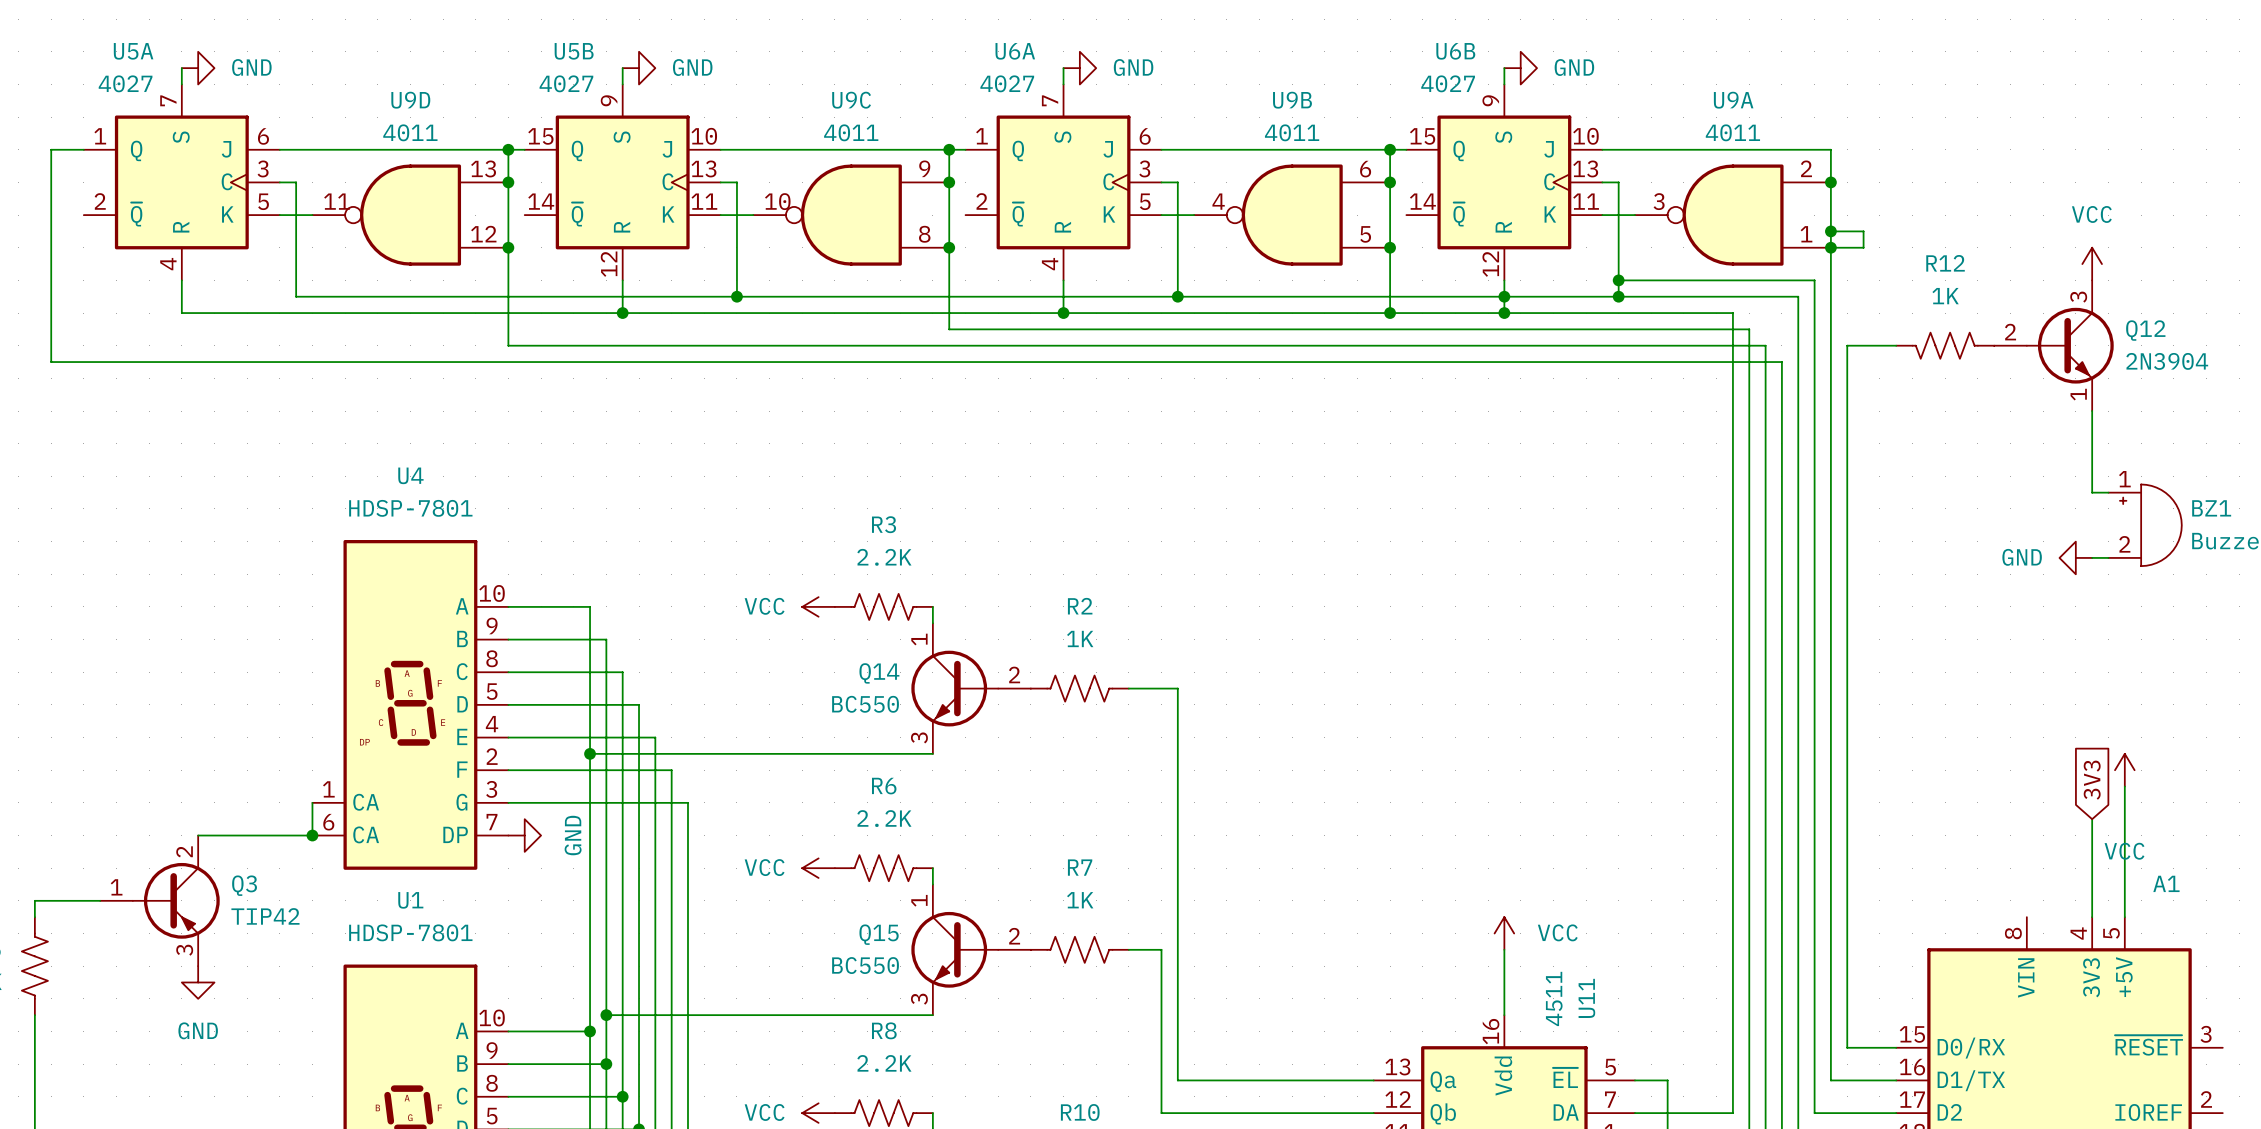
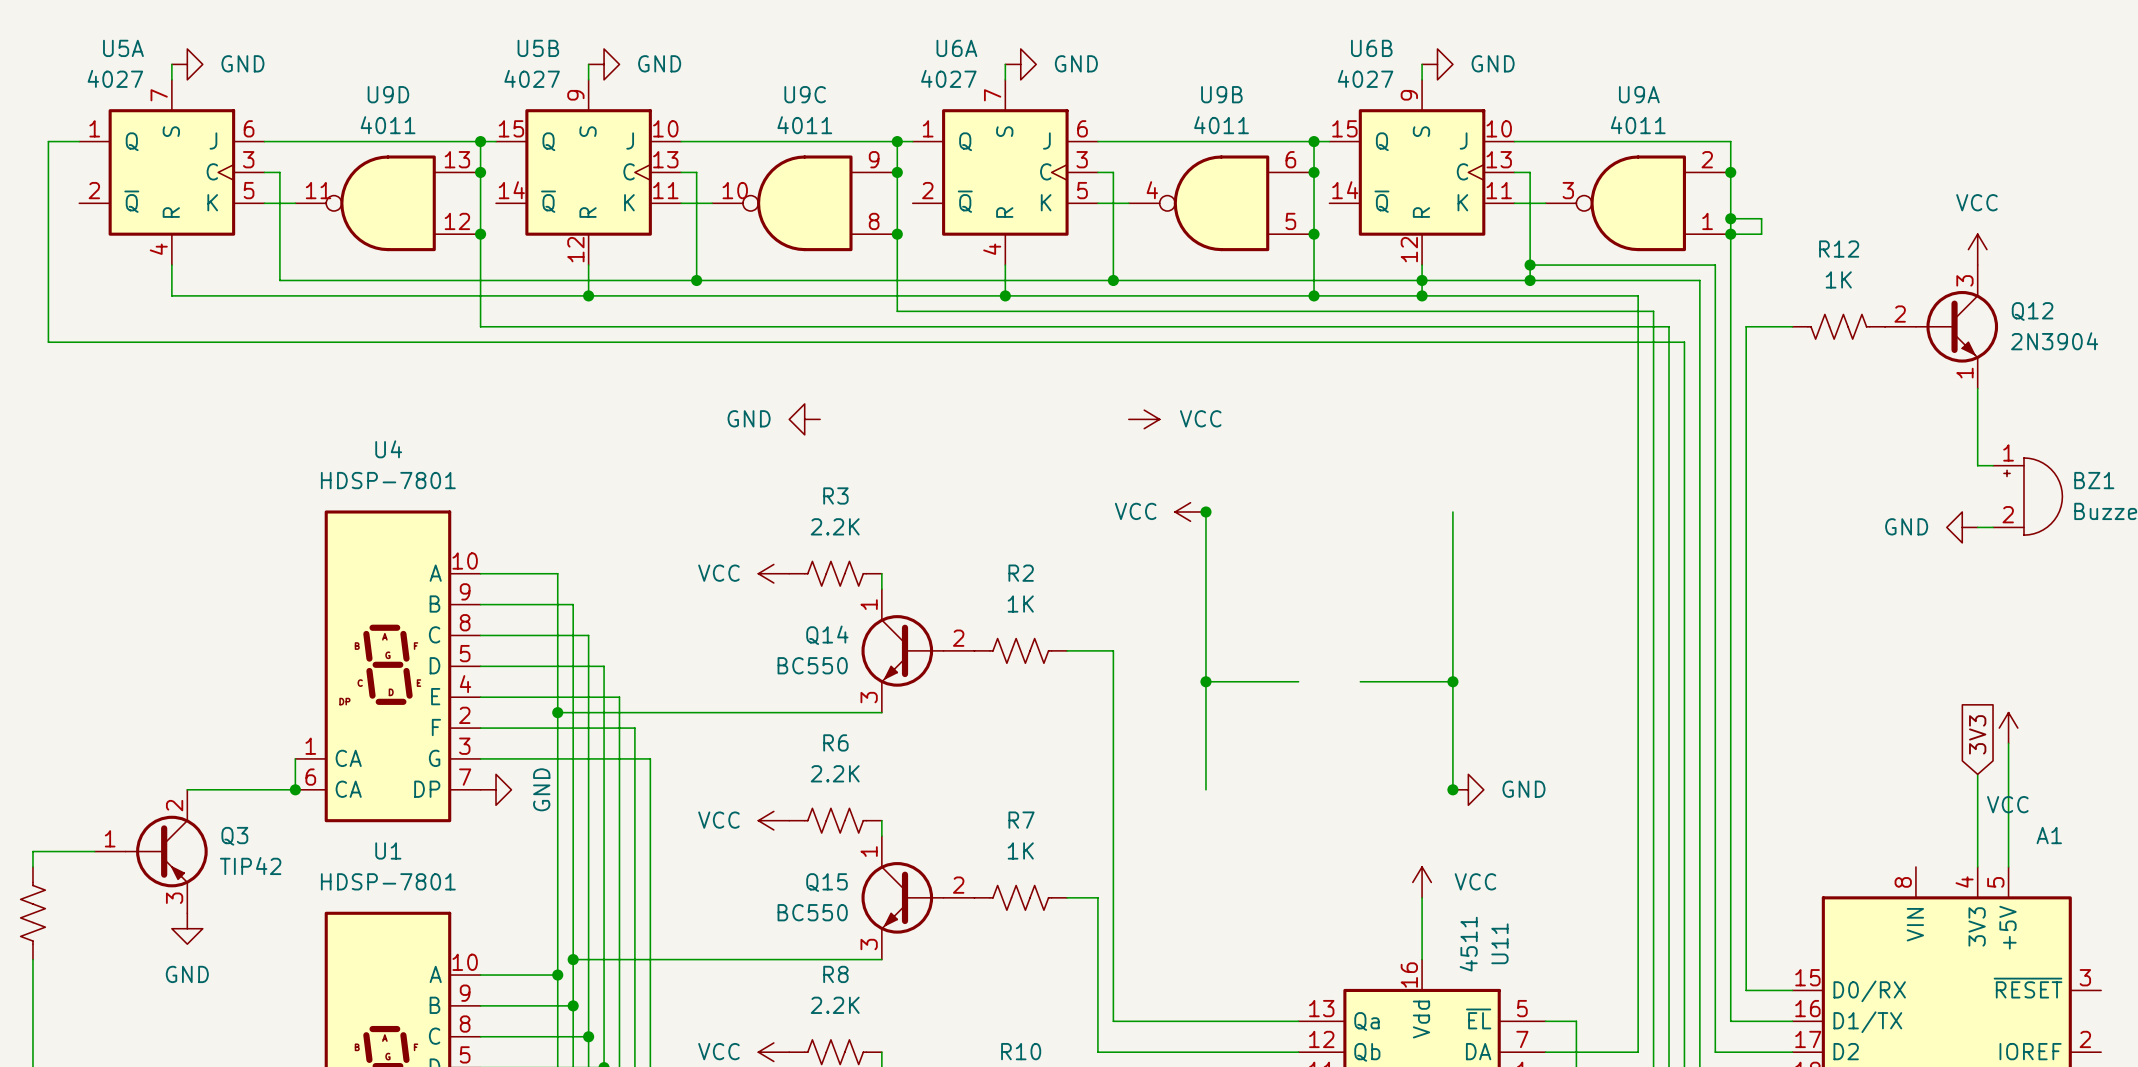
power symbol: none -> GND (804, 419)
power symbol: none -> VCC (1144, 419)
power symbol: none -> VCC (1190, 511)
wire: none -> (1205, 511) (1205, 789)
junction: none -> (1205, 511)
wire: none -> (1452, 511) (1452, 789)
wire: none -> (1205, 681) (1298, 681)
junction: none -> (1205, 681)
wire: none -> (1360, 681) (1452, 681)
junction: none -> (1452, 681)
junction: none -> (1452, 789)
power symbol: none -> GND (1468, 789)

